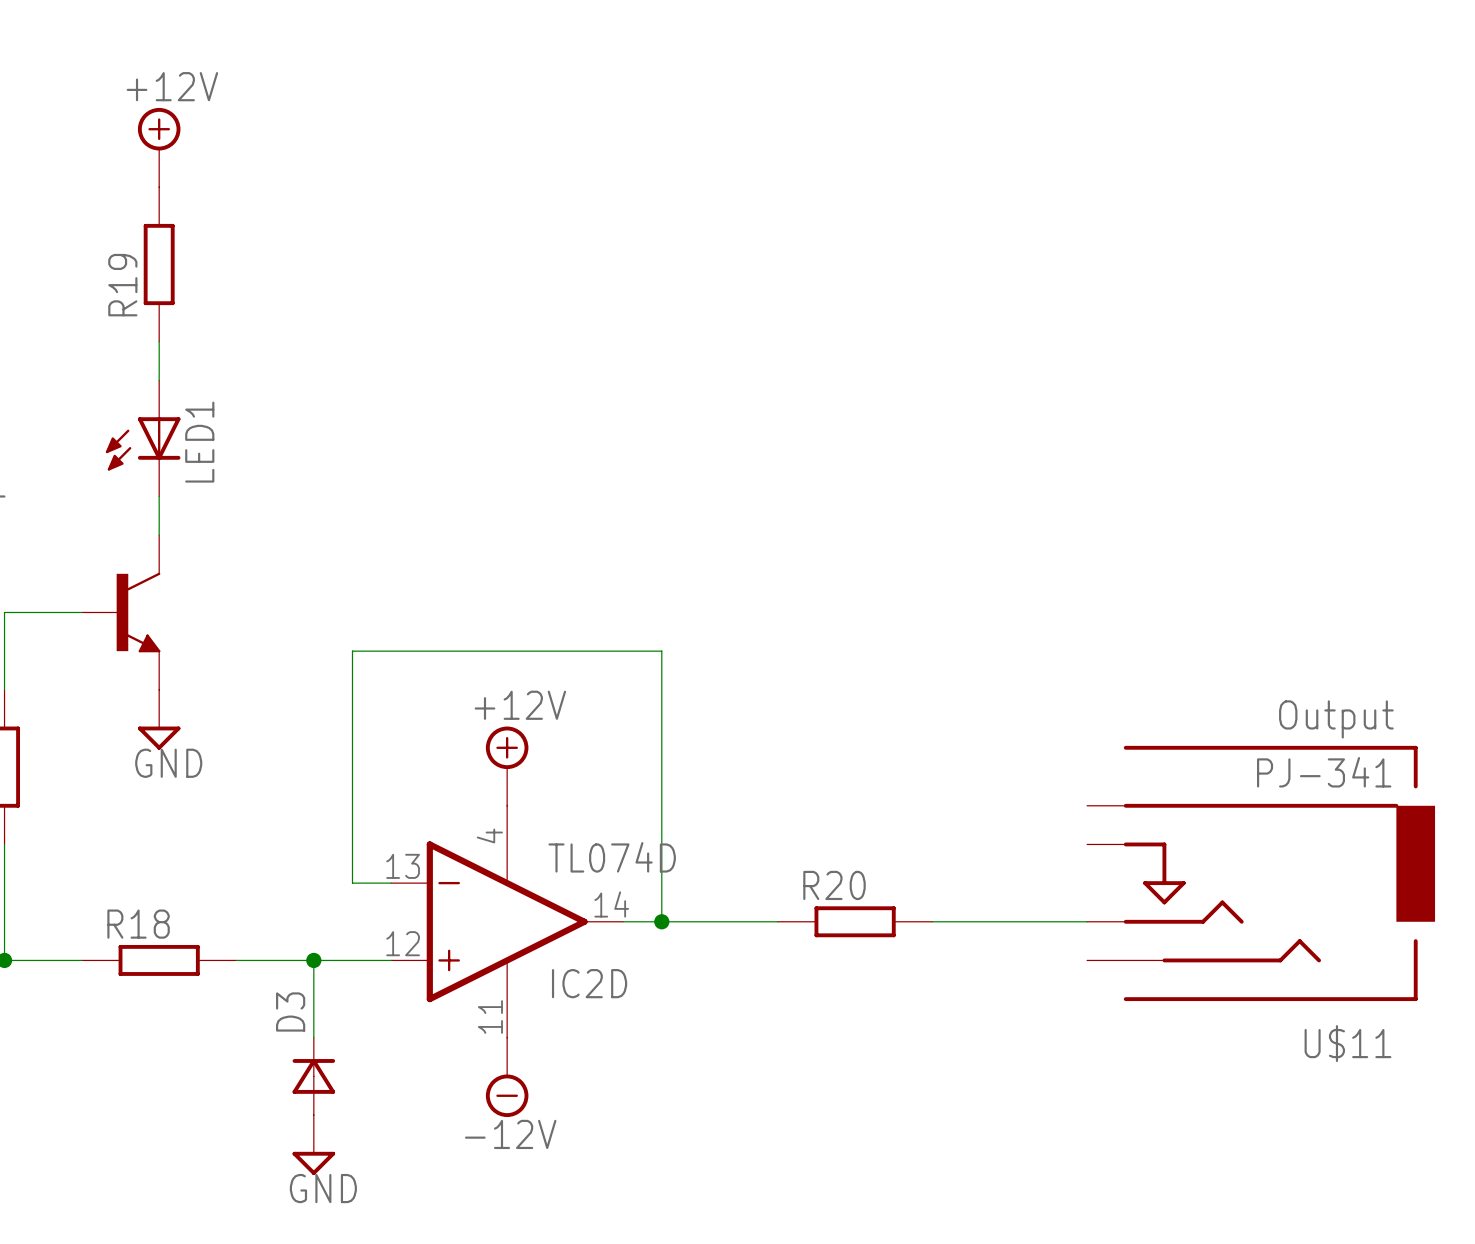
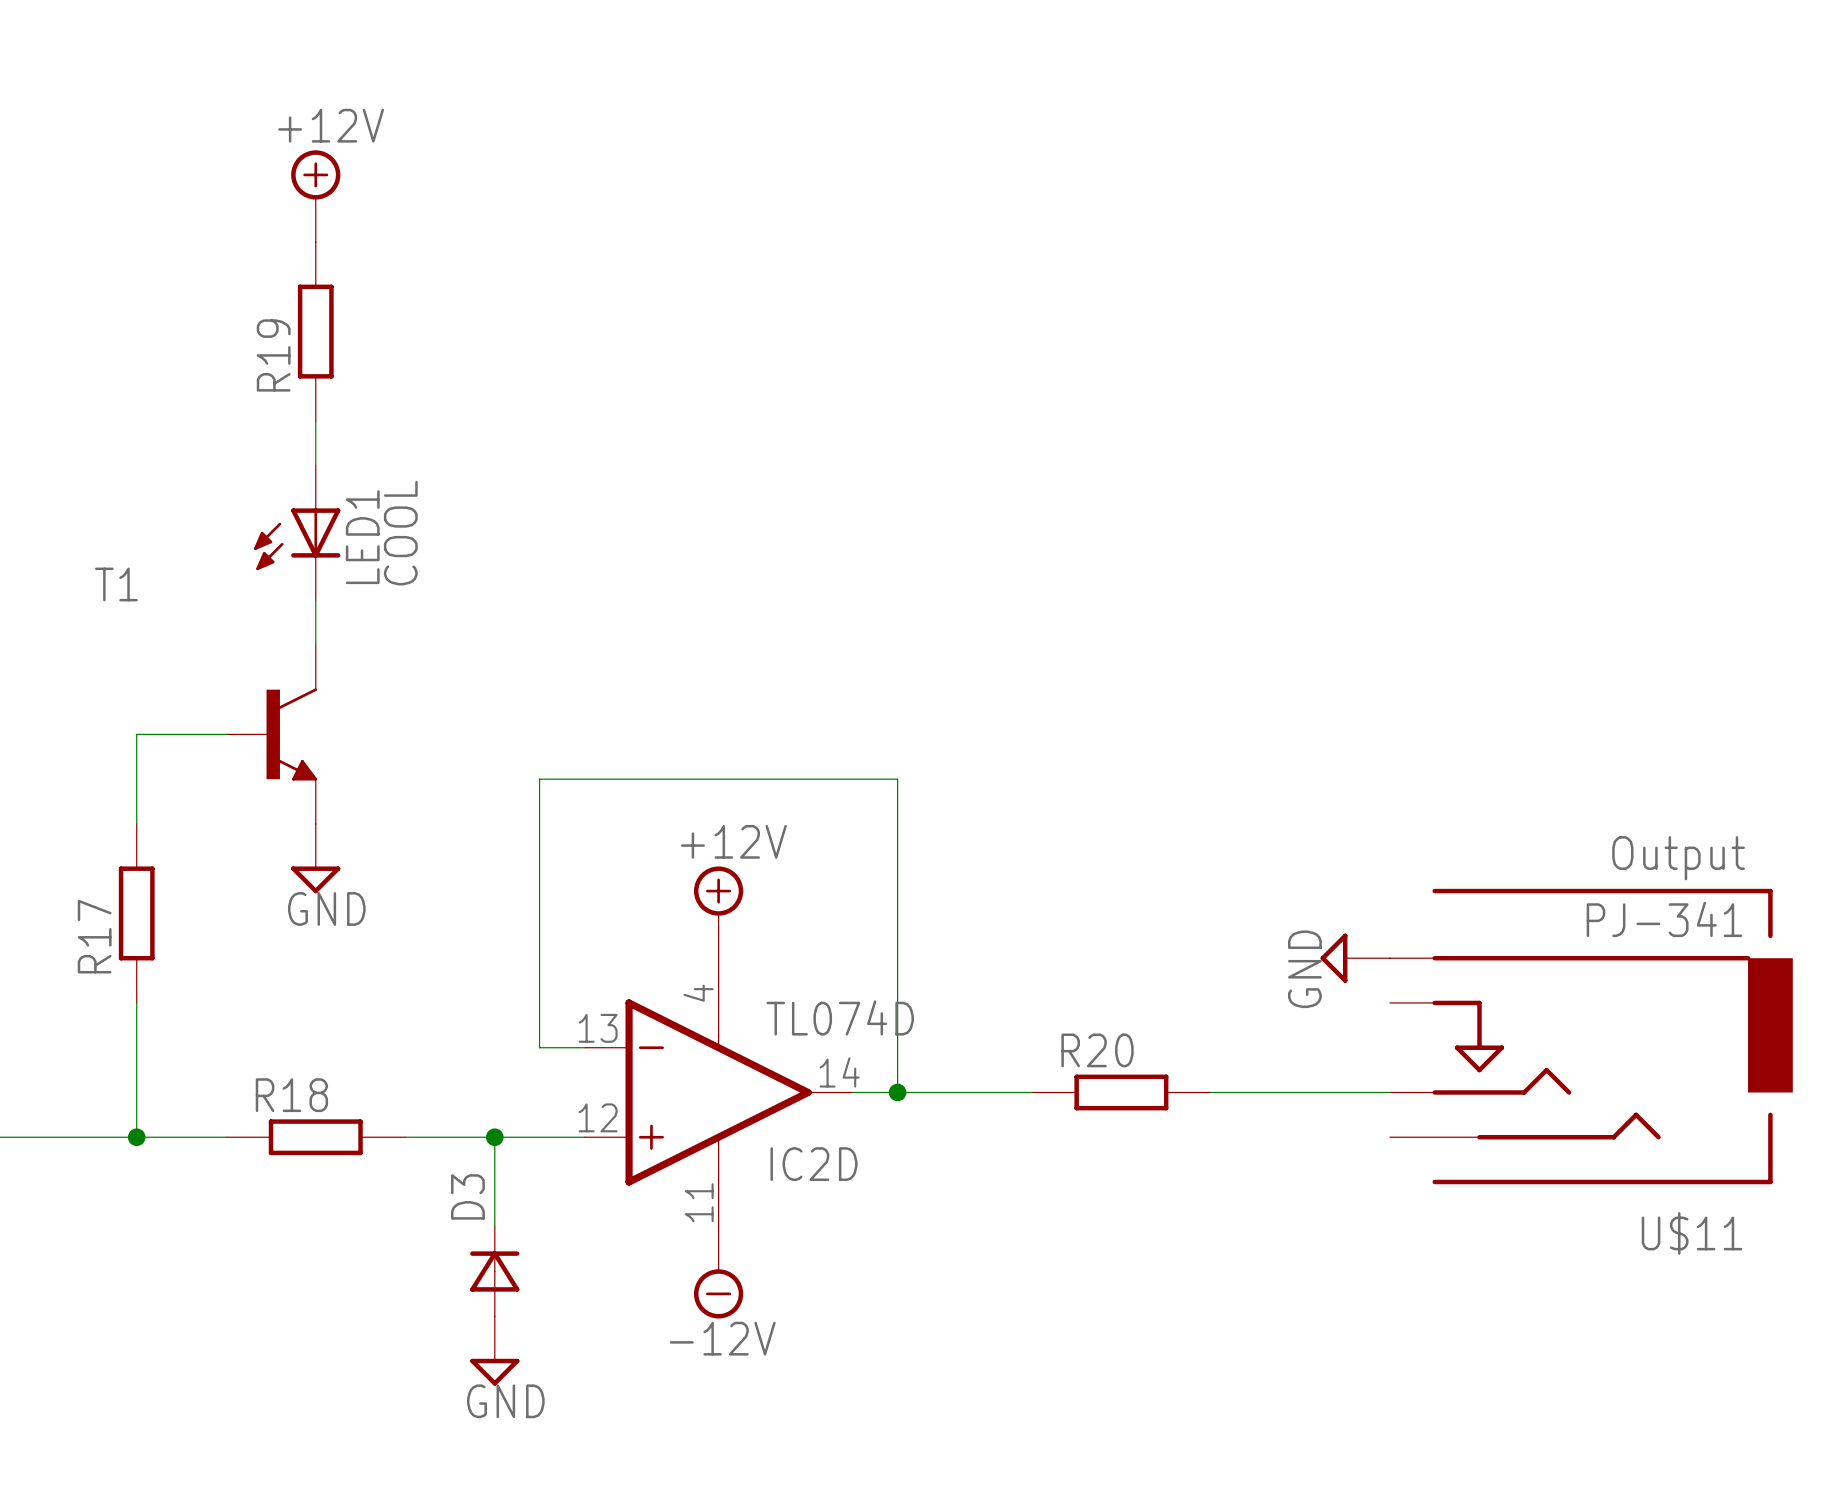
LED1 value: none -> COOL (400, 533)
power symbol: none -> GND (1355, 958)

